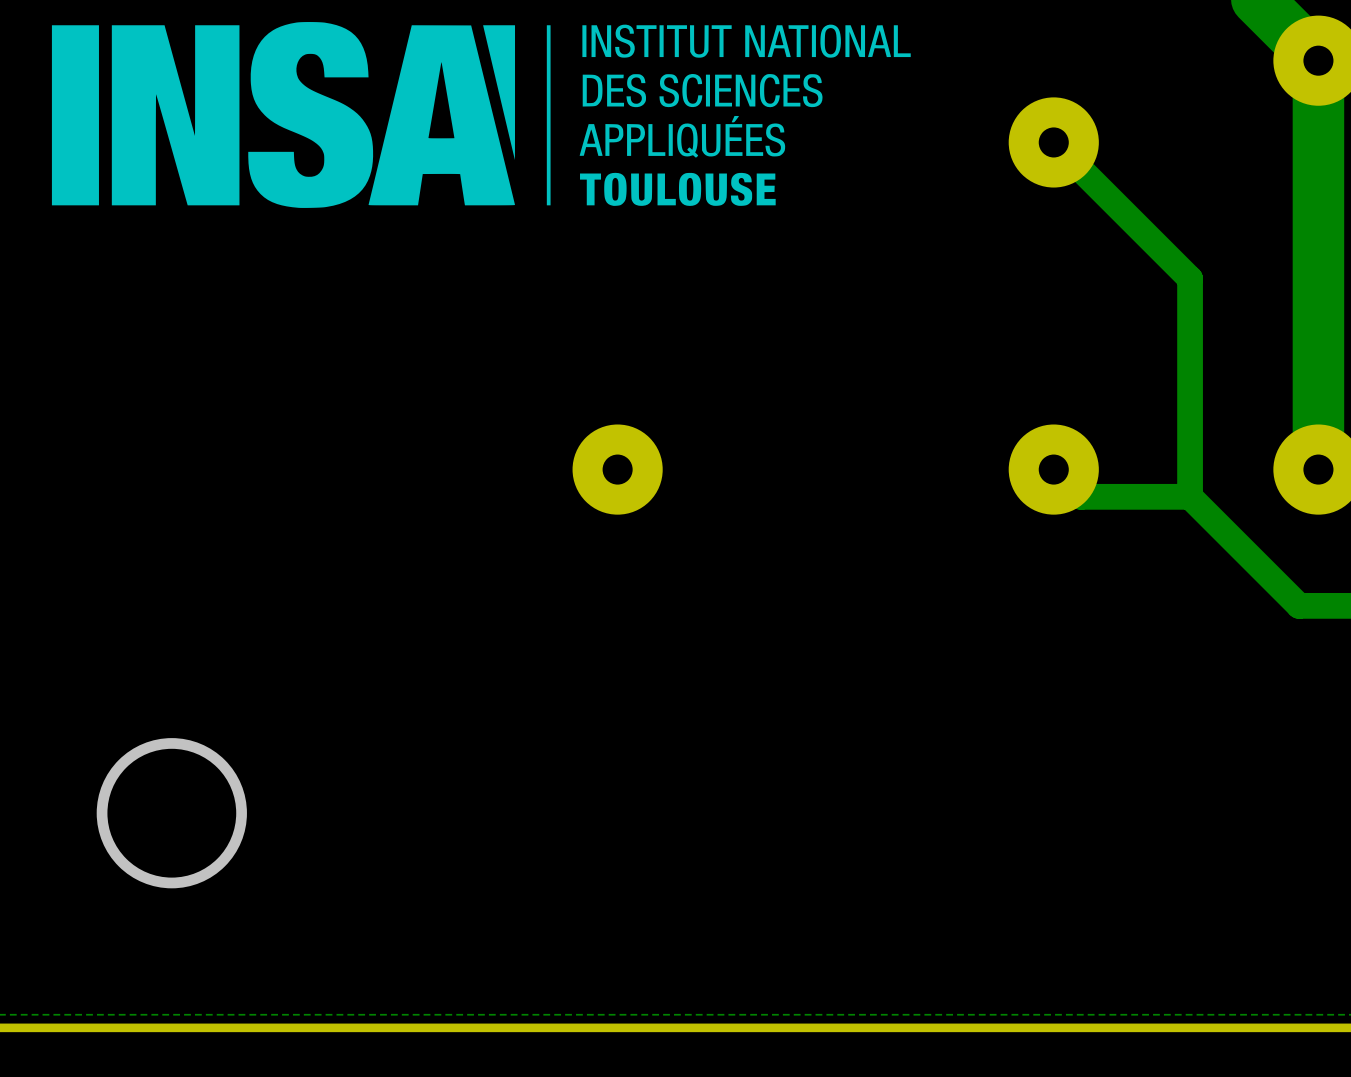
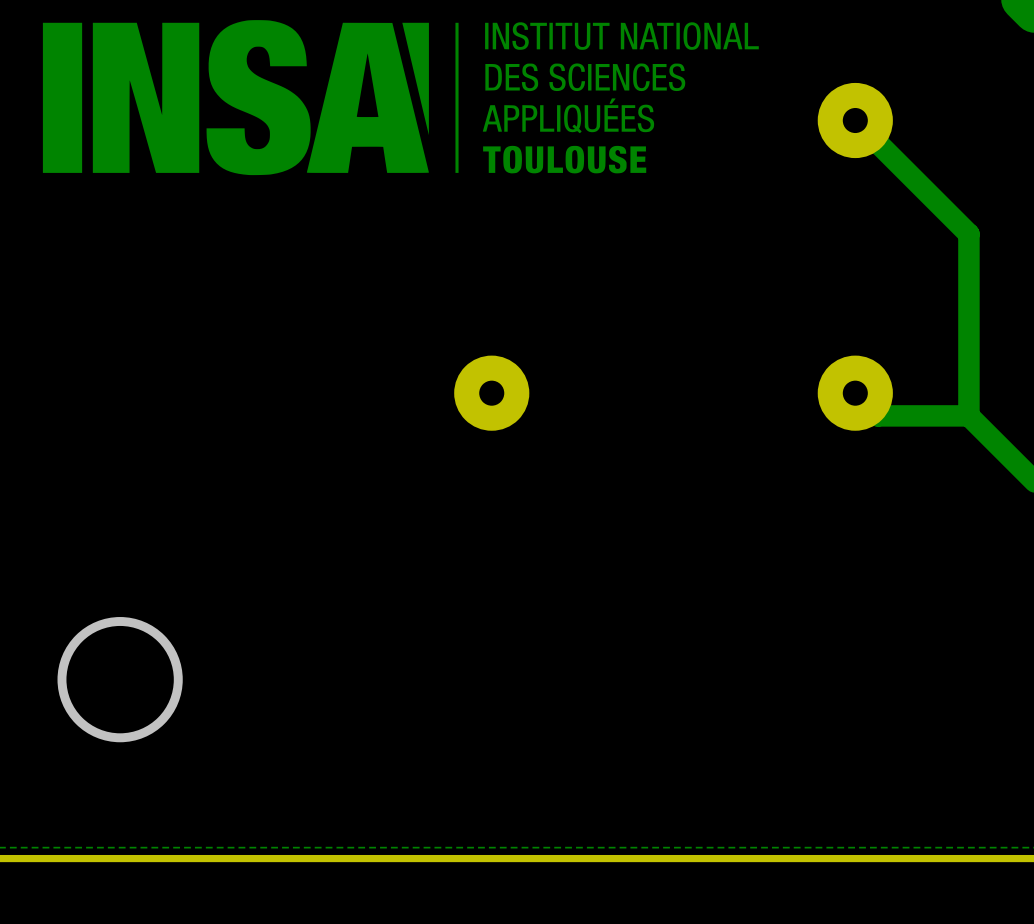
drawing shape: [51, 22, 911, 208] -> [42, 20, 759, 176]

